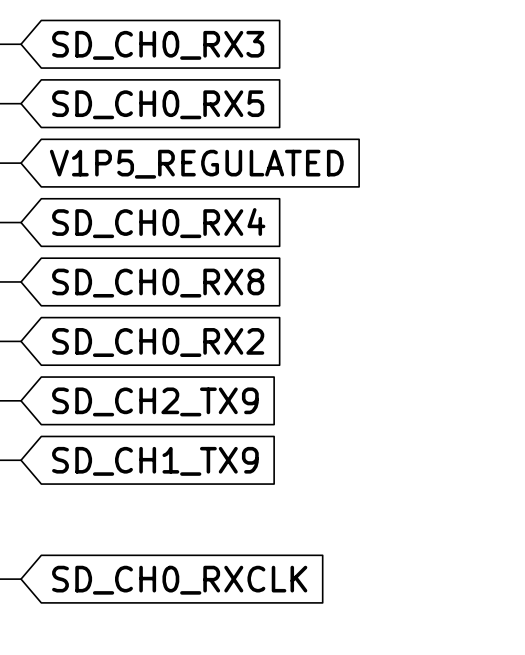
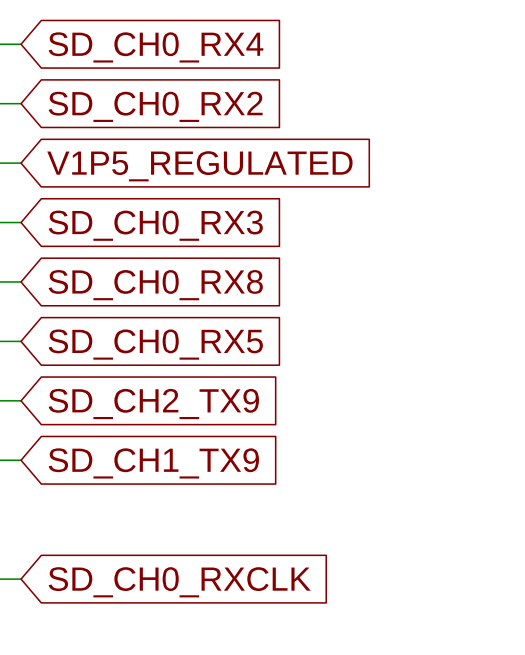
global label: SD_CH0_RX3 (158, 45) -> SD_CH0_RX4 (155, 47)
global label: SD_CH0_RX5 (158, 104) -> SD_CH0_RX2 (155, 106)
global label: SD_CH0_RX4 (158, 223) -> SD_CH0_RX3 (155, 225)
global label: SD_CH0_RX2 (158, 342) -> SD_CH0_RX5 (155, 344)

